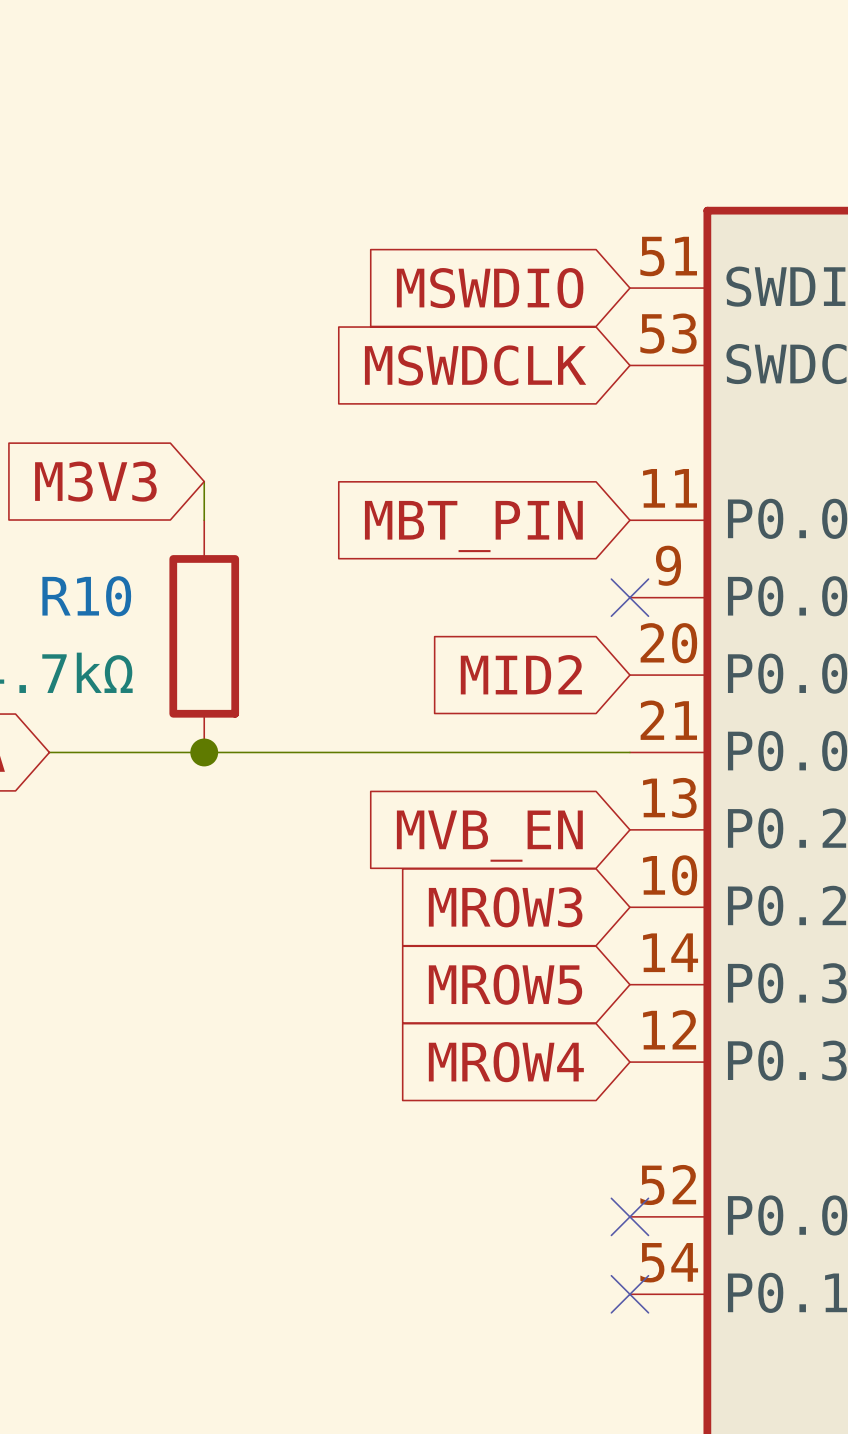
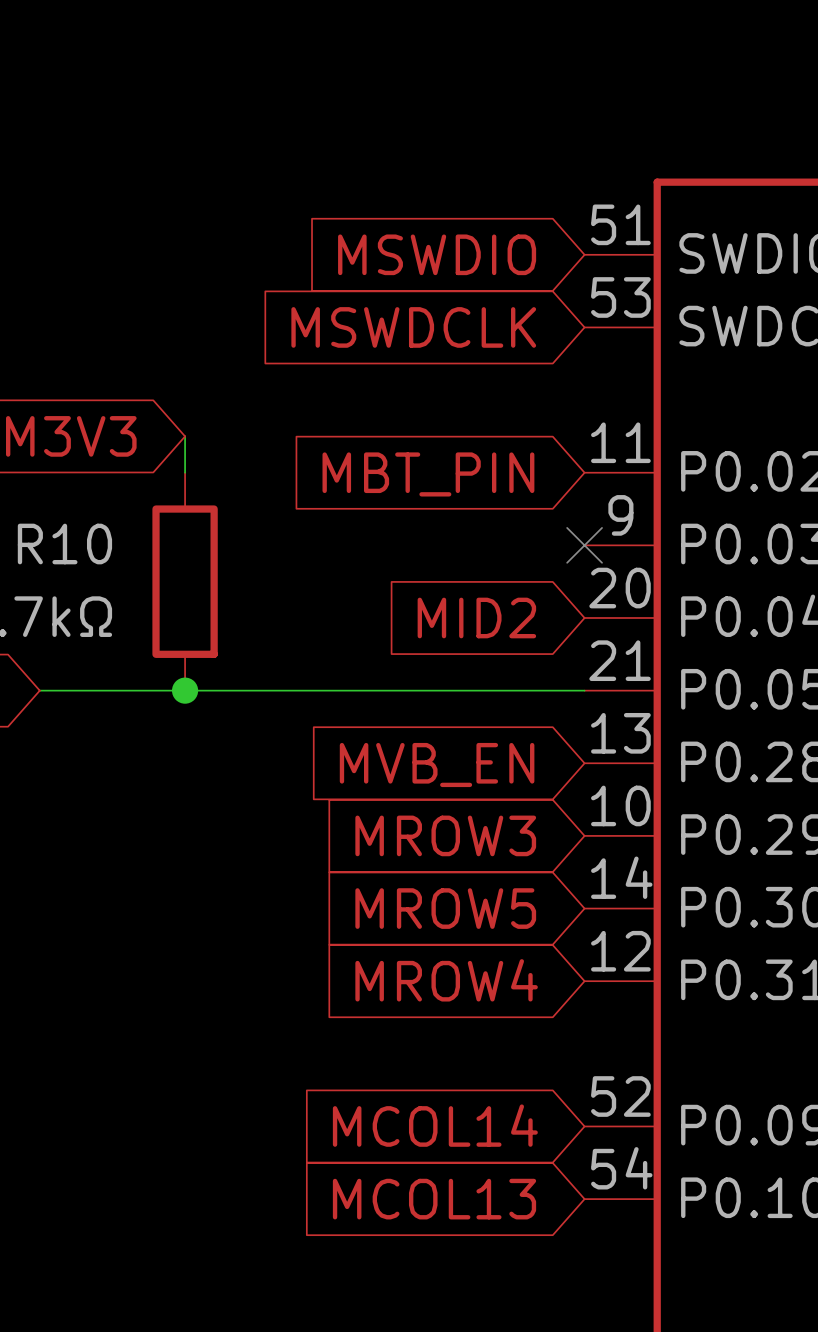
global label: none -> MCOL14 (435, 1125)
no-connect mark: (629, 1216) -> none
global label: none -> MCOL13 (434, 1199)
no-connect mark: (629, 1294) -> none

